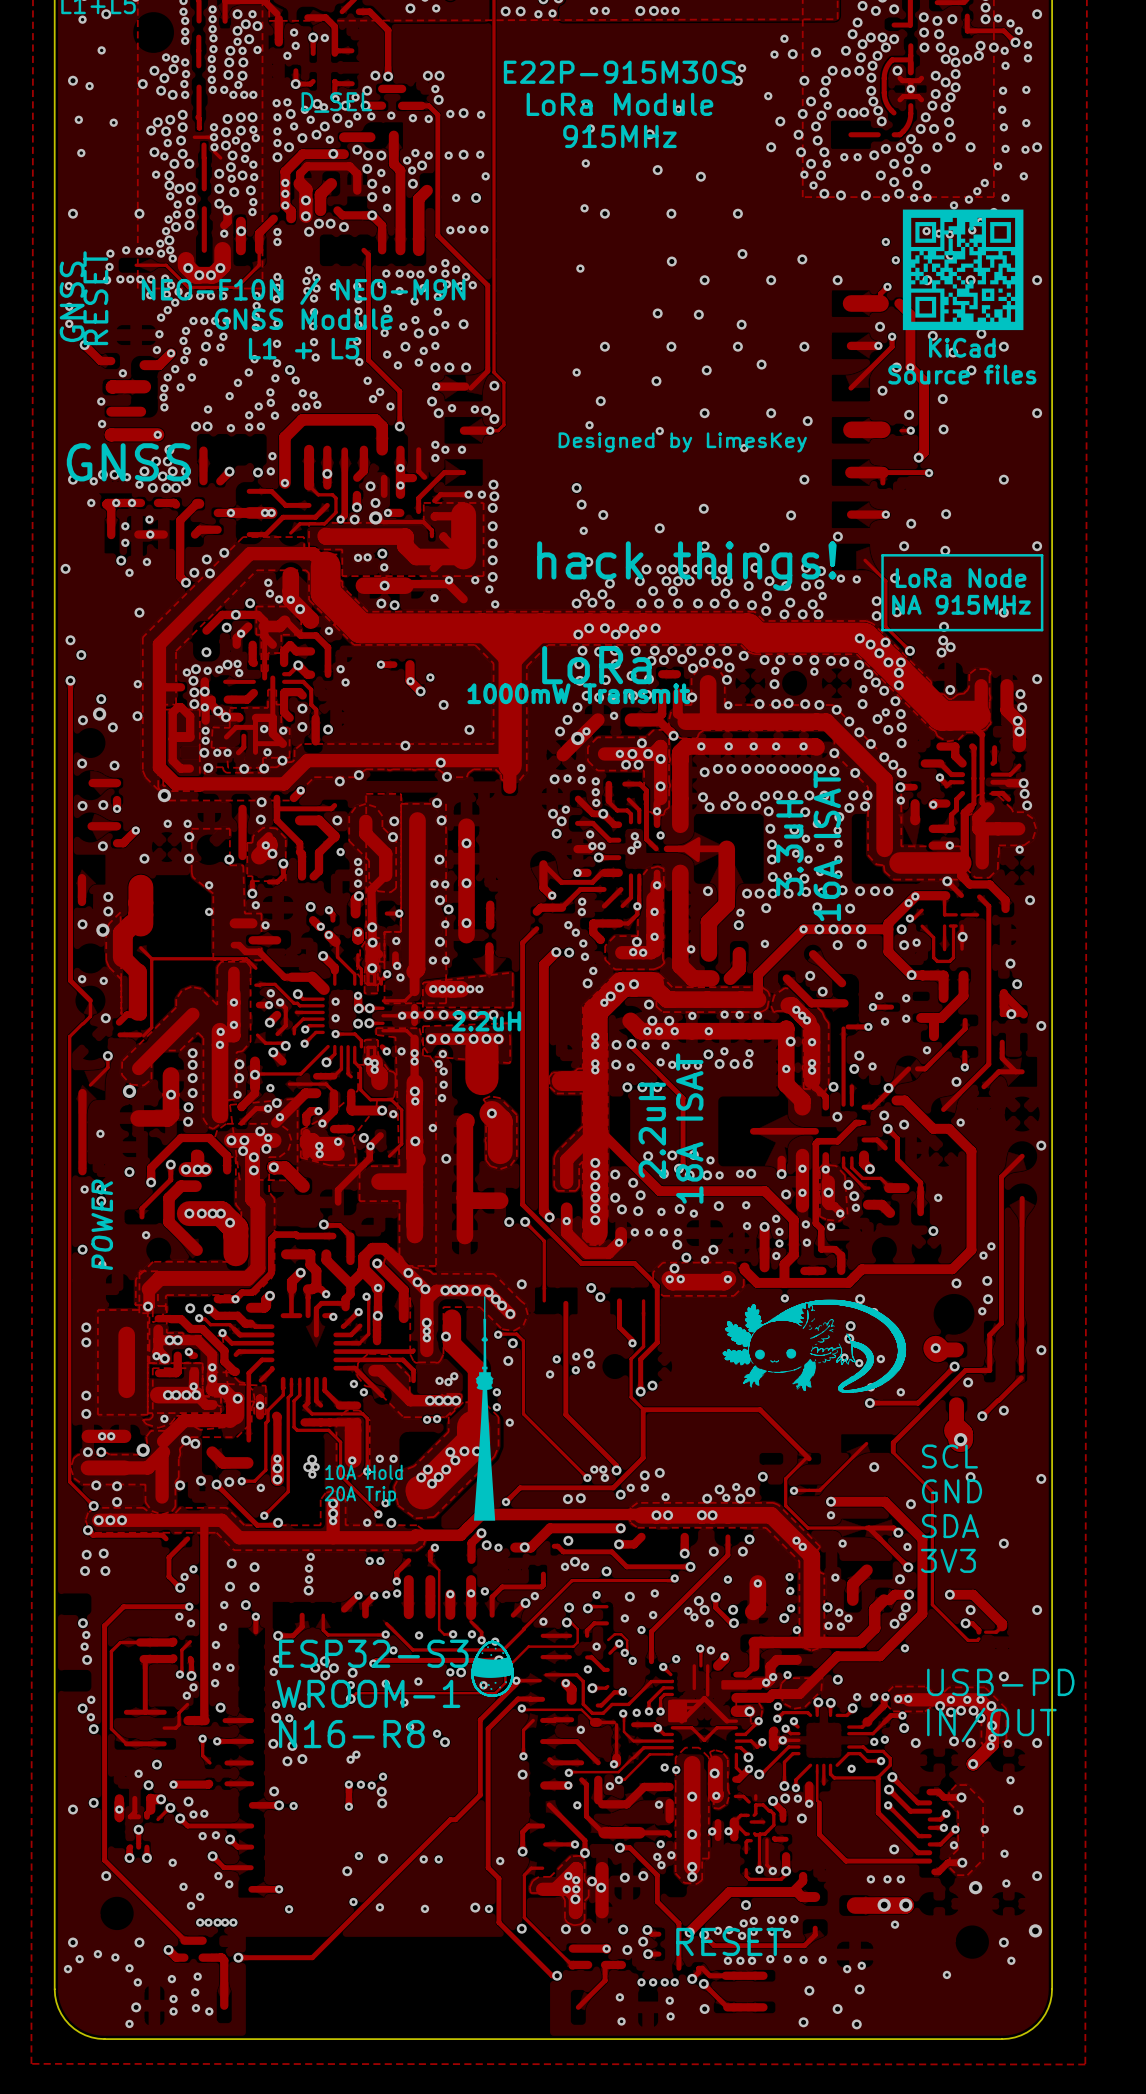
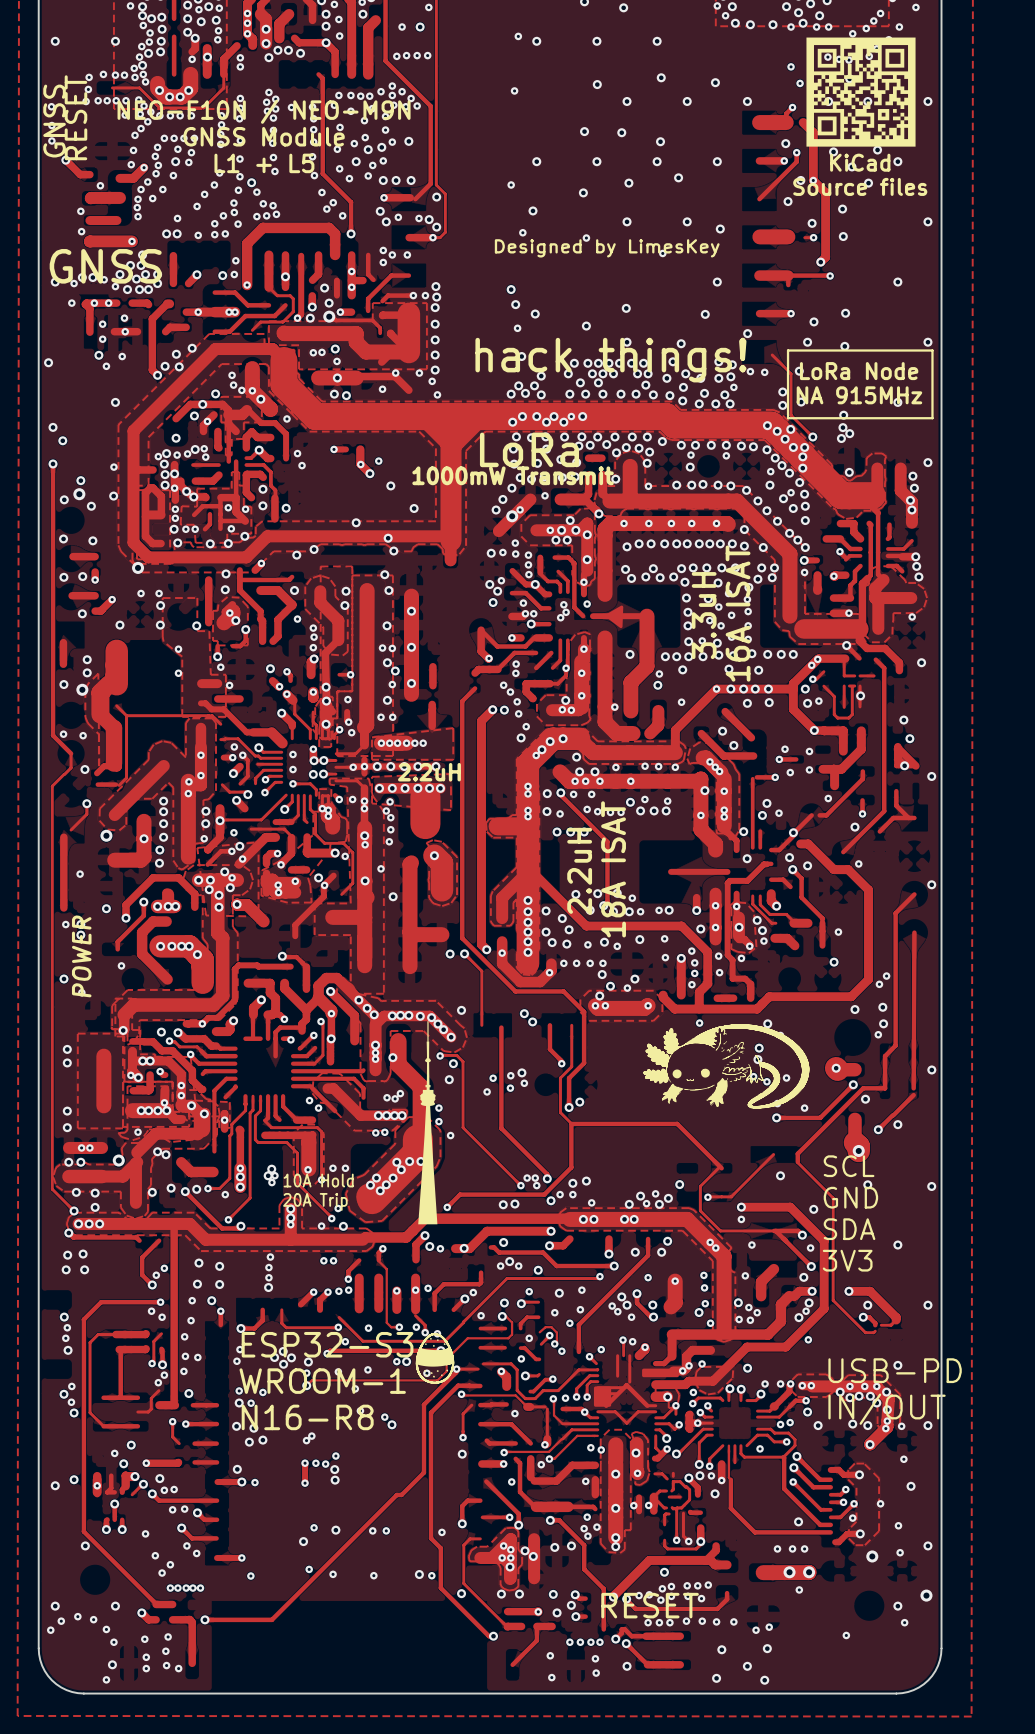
track: none -> (675, 1405) (675, 1414)

